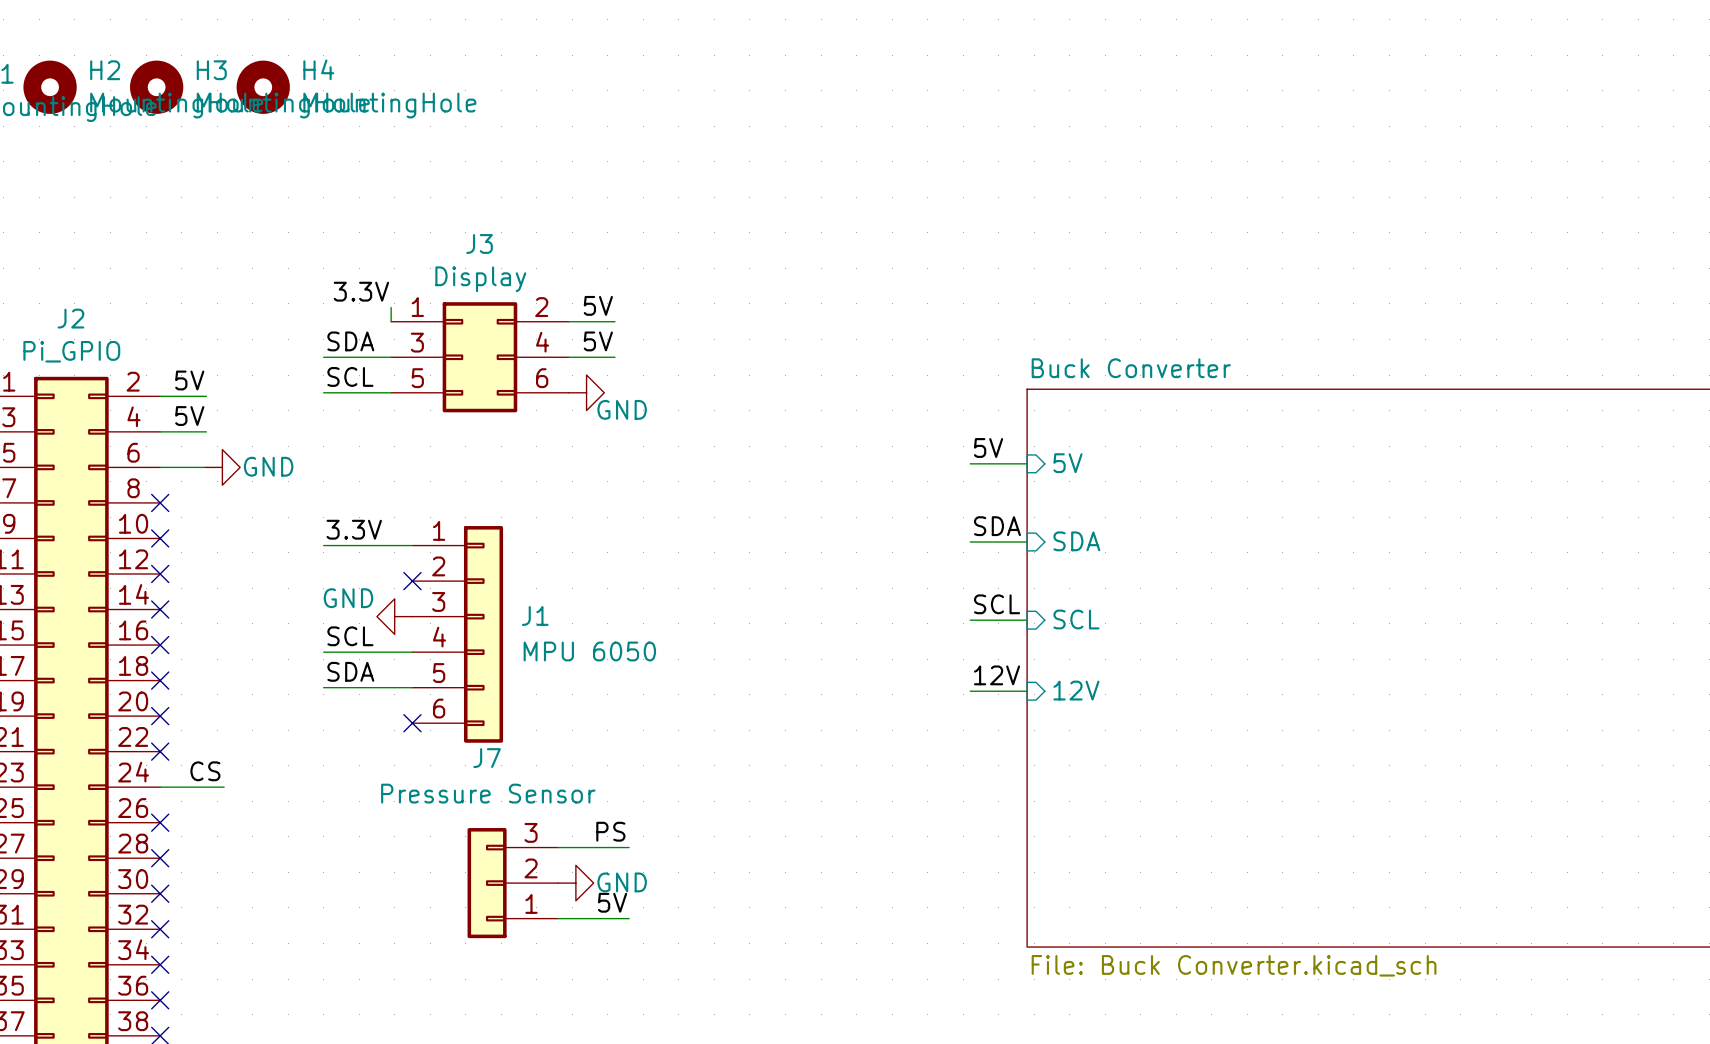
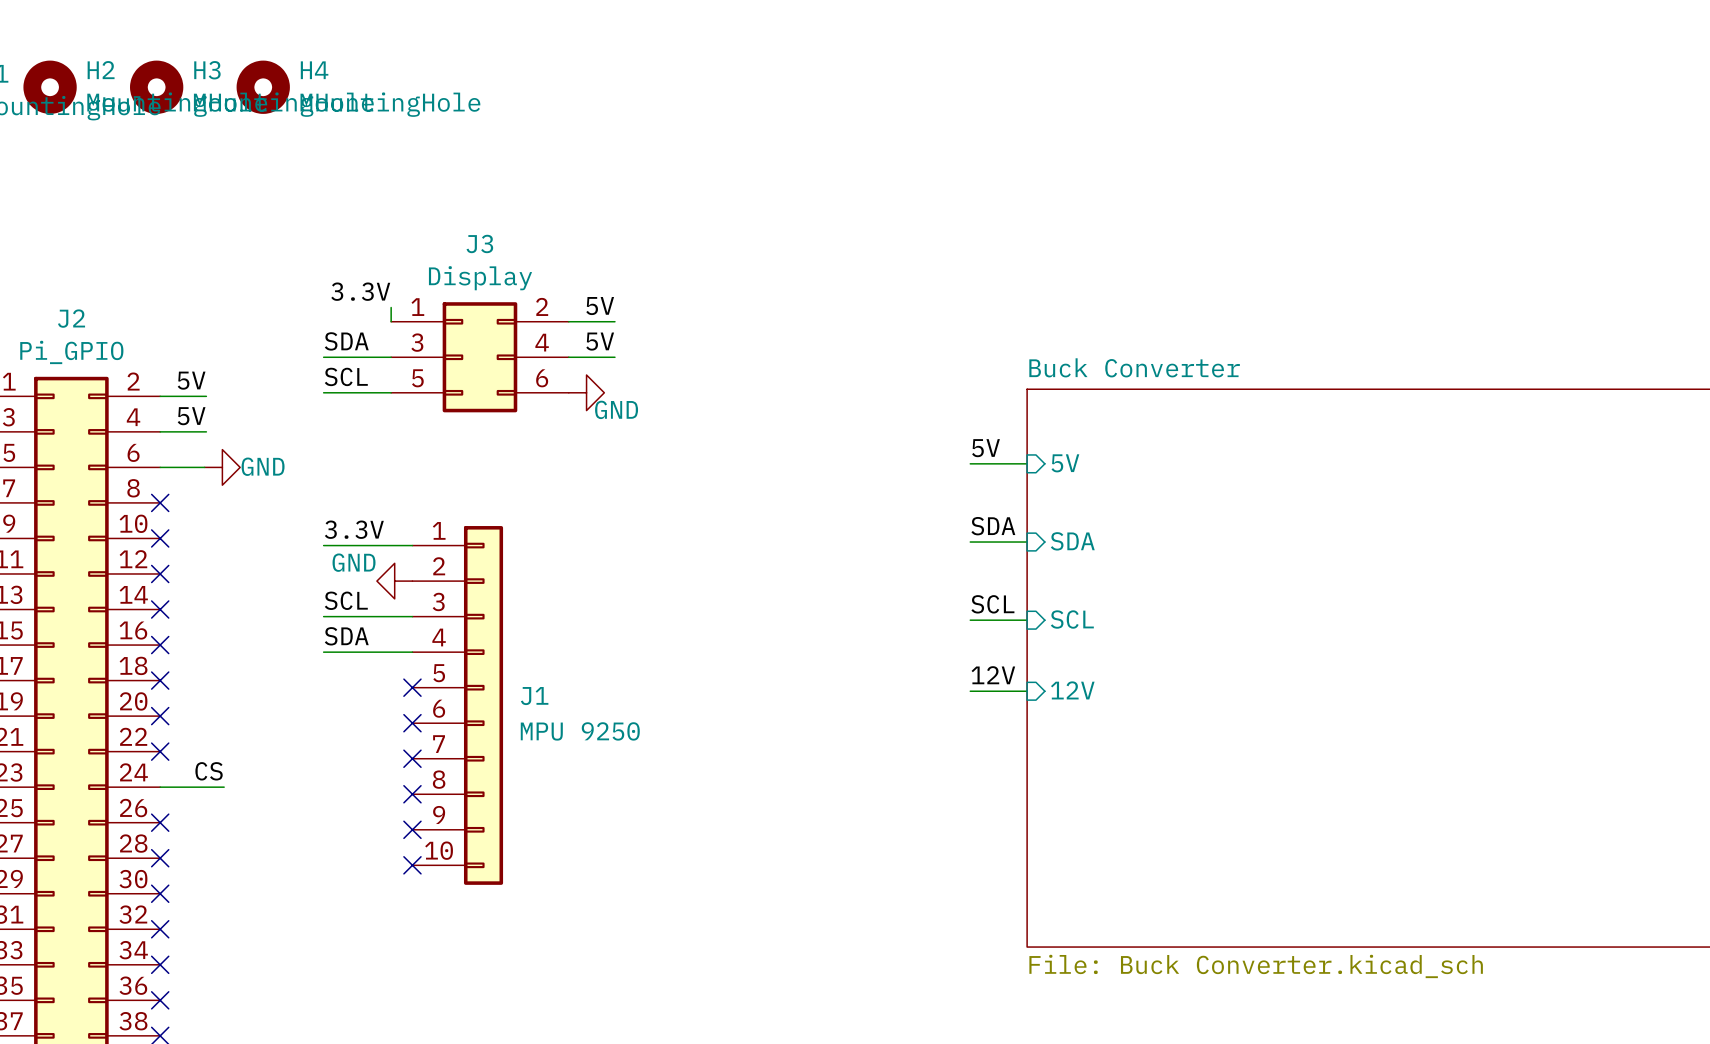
J1 symbol: [412, 526, 504, 743] -> [412, 526, 504, 885]
no-connect mark: (412, 581) -> none
label: none -> SCL (346, 600)
power symbol position: GND (394, 616) -> GND (394, 581)
label: SCL (350, 636) -> SDA (346, 636)
J1 value: MPU 6050 (589, 651) -> MPU 9250 (580, 731)
label: SDA (350, 671) -> none
wire: (323, 687) (412, 687) -> (323, 616) (412, 616)
no-connect mark: none -> (412, 687)
no-connect mark: none -> (412, 758)
no-connect mark: none -> (412, 794)
no-connect mark: none -> (412, 829)
label: PS (610, 831) -> none
wire: (558, 847) (629, 847) -> none
no-connect mark: none -> (412, 865)
J7: Pressure Sensor (512, 883) -> none
power symbol: GND (575, 883) -> none
label: 5V (612, 902) -> none
wire: (558, 918) (629, 918) -> none

